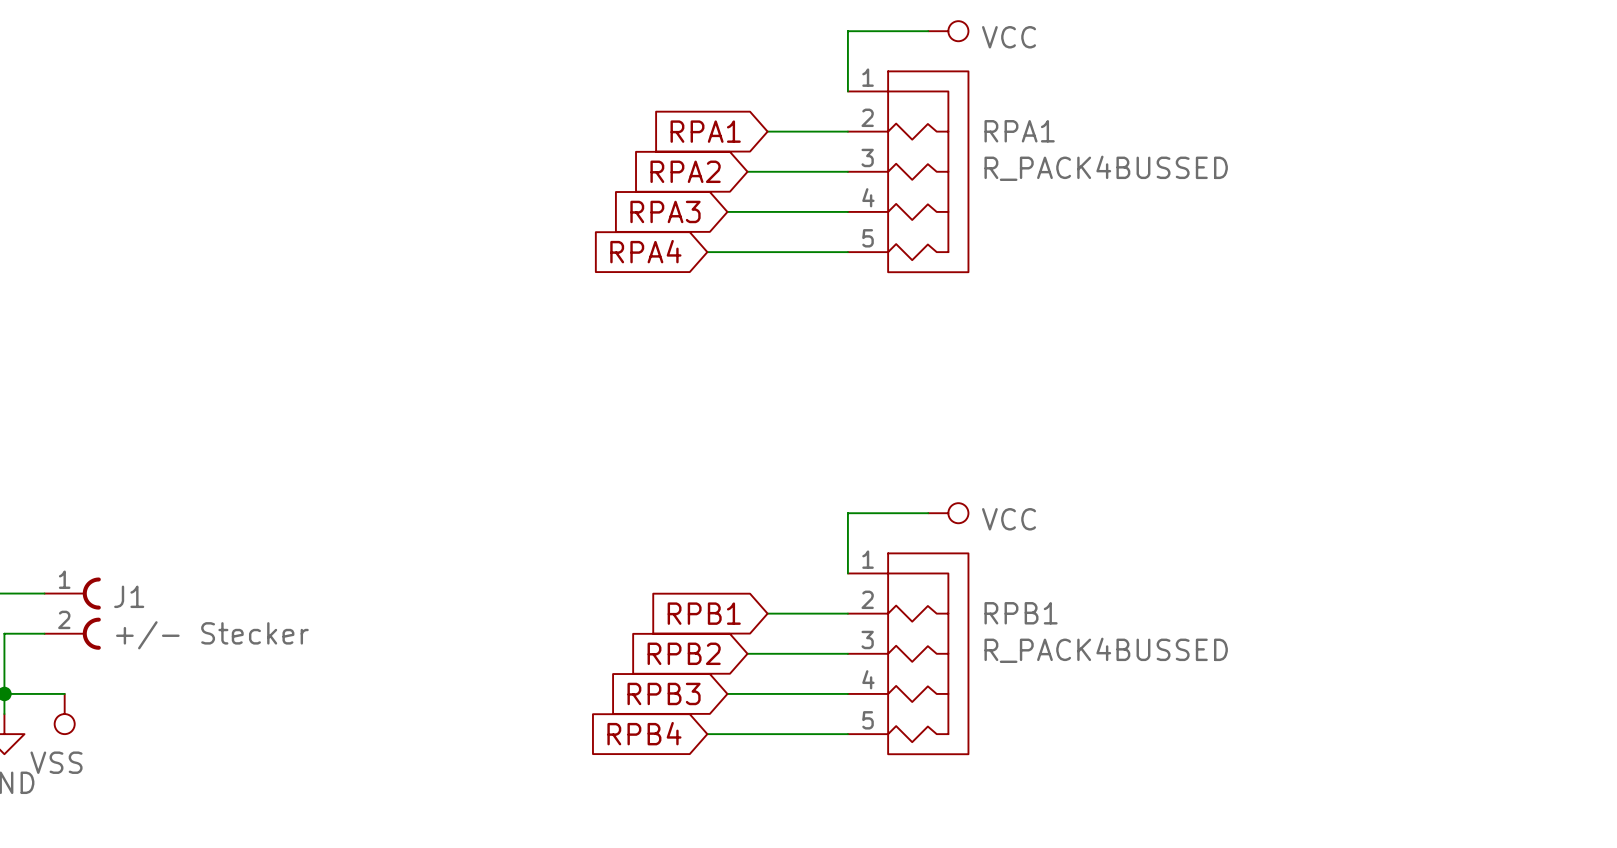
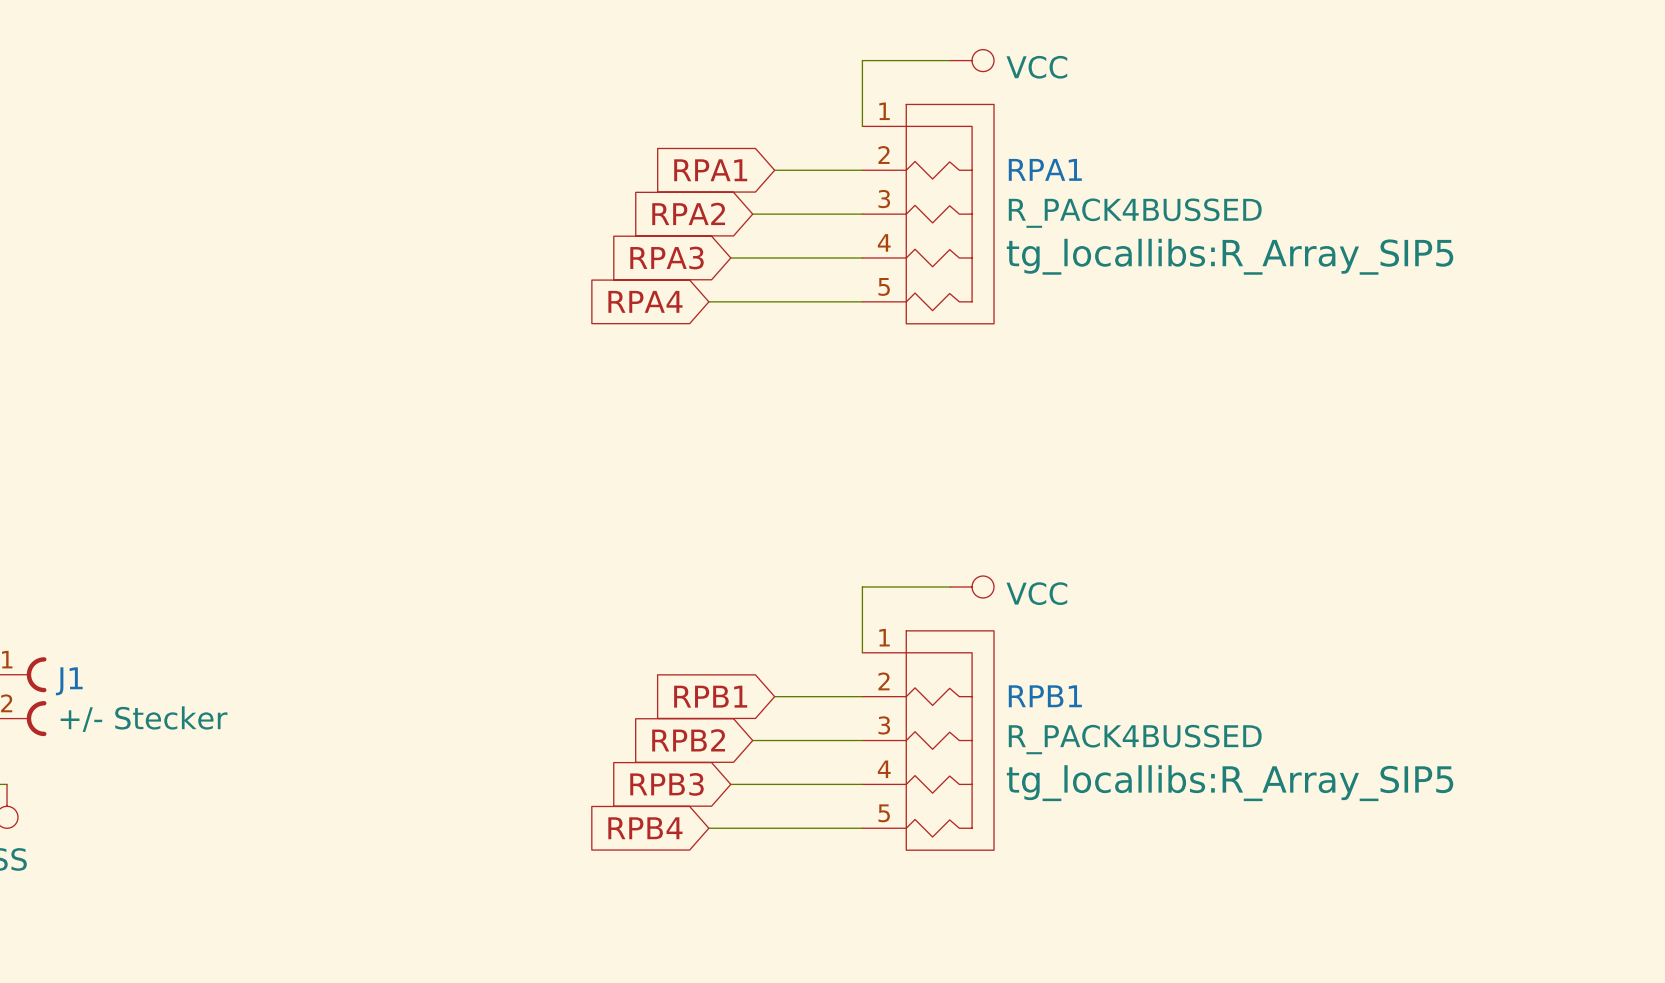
RPA1 text: none -> tg_locallibs:R_Array_SIP5 (1230, 256)
RPB1 text: none -> tg_locallibs:R_Array_SIP5 (1230, 783)

